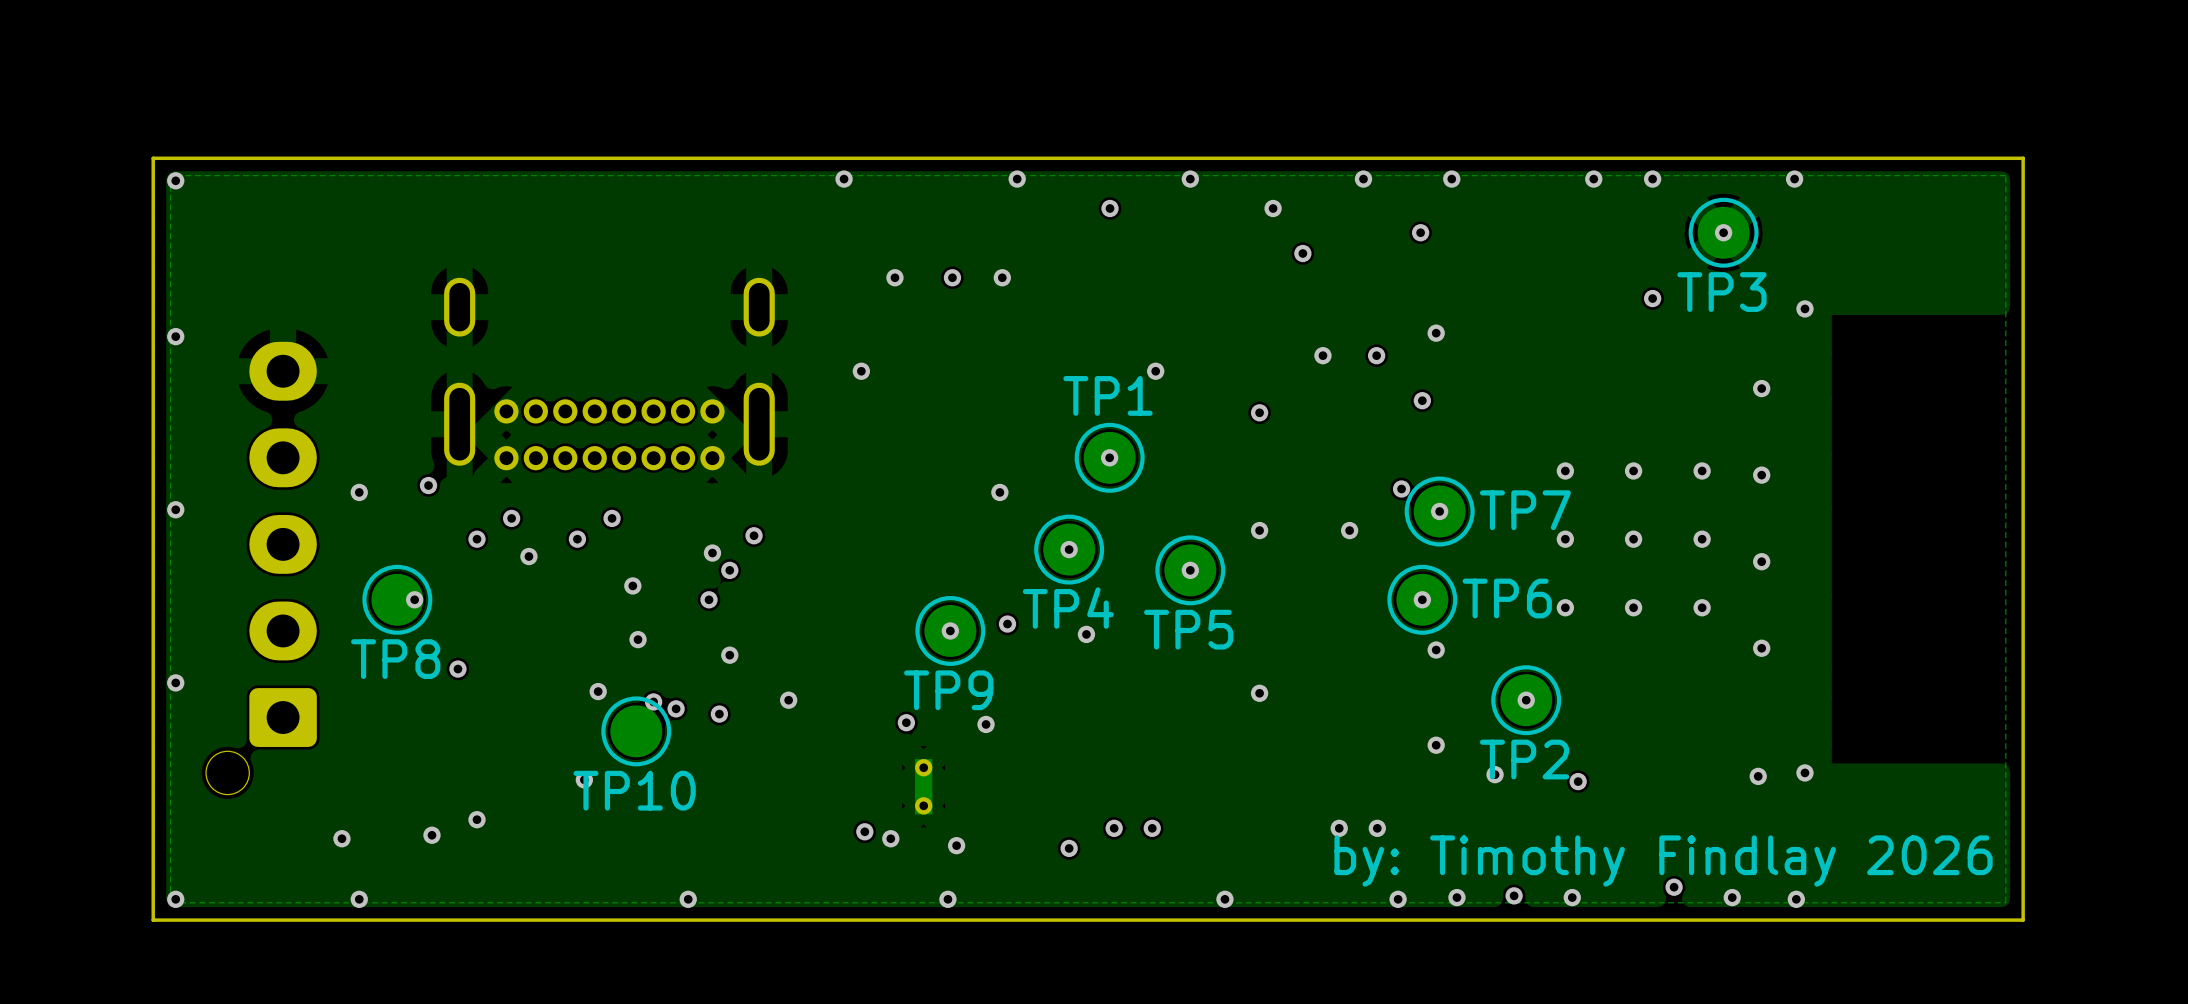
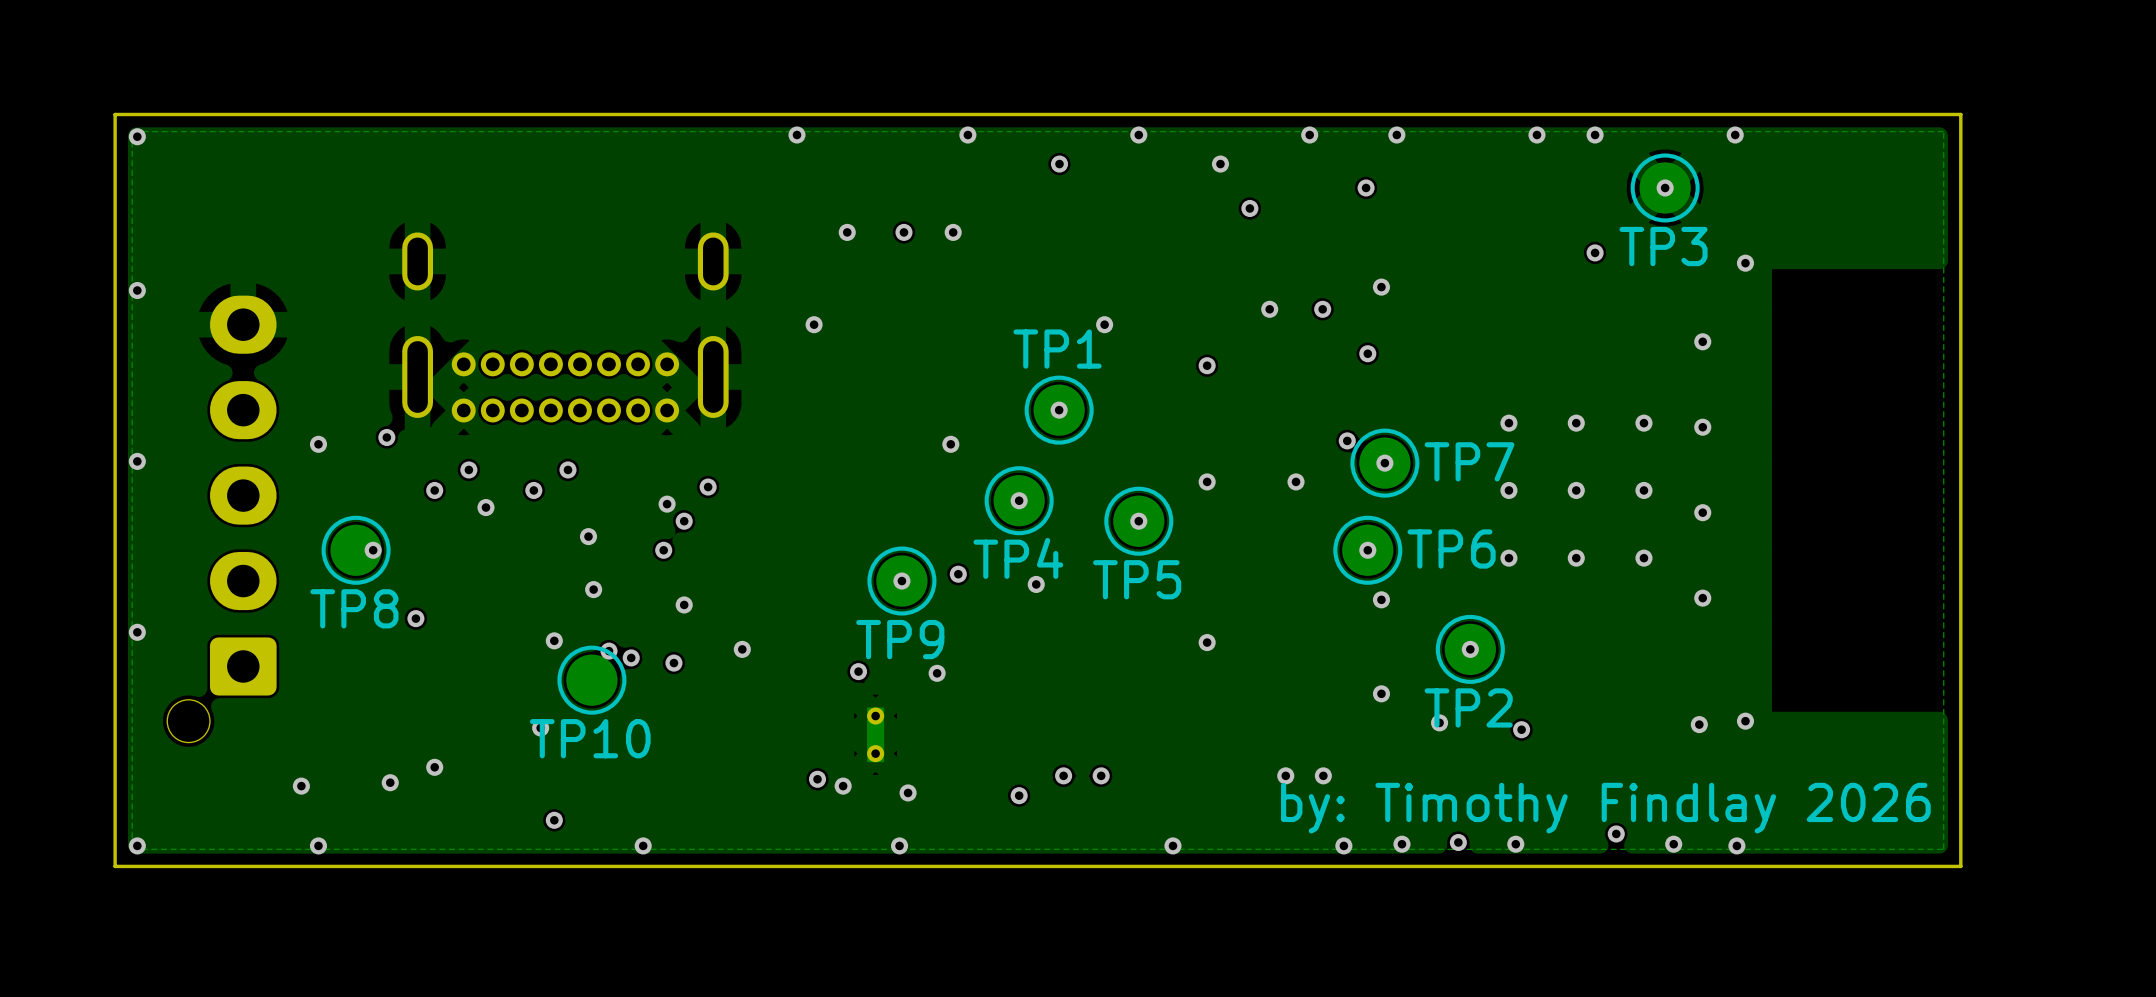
via: none -> (554, 820)

